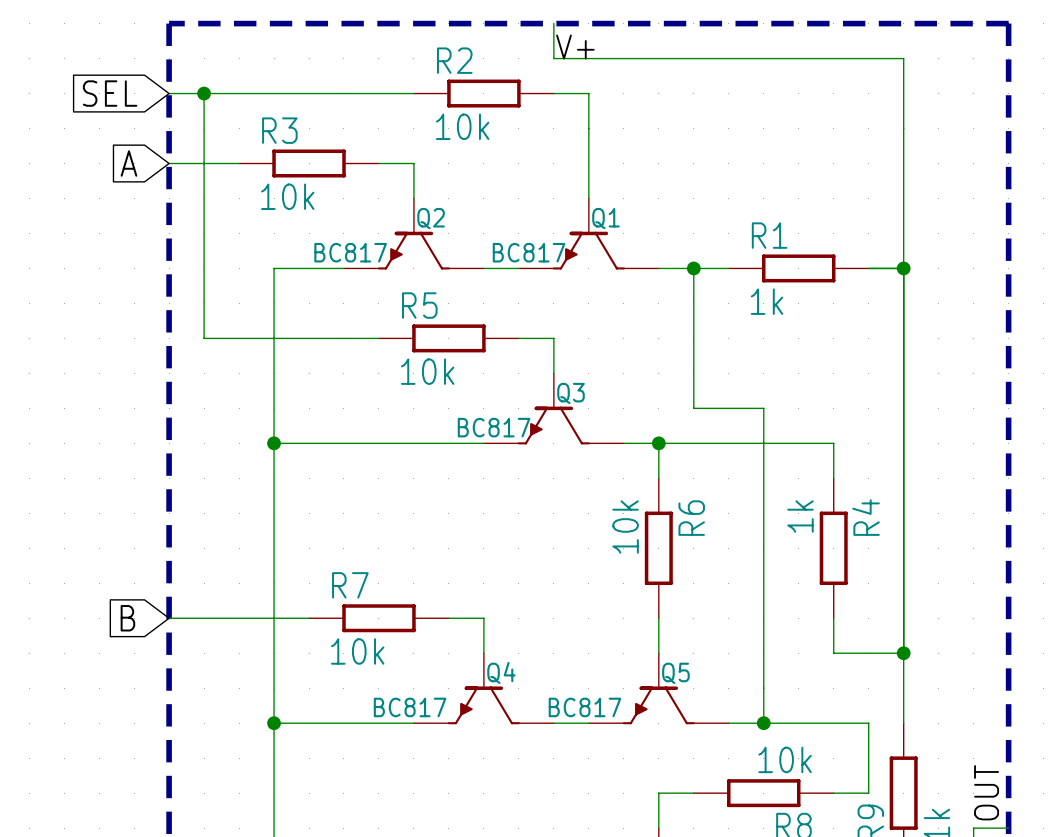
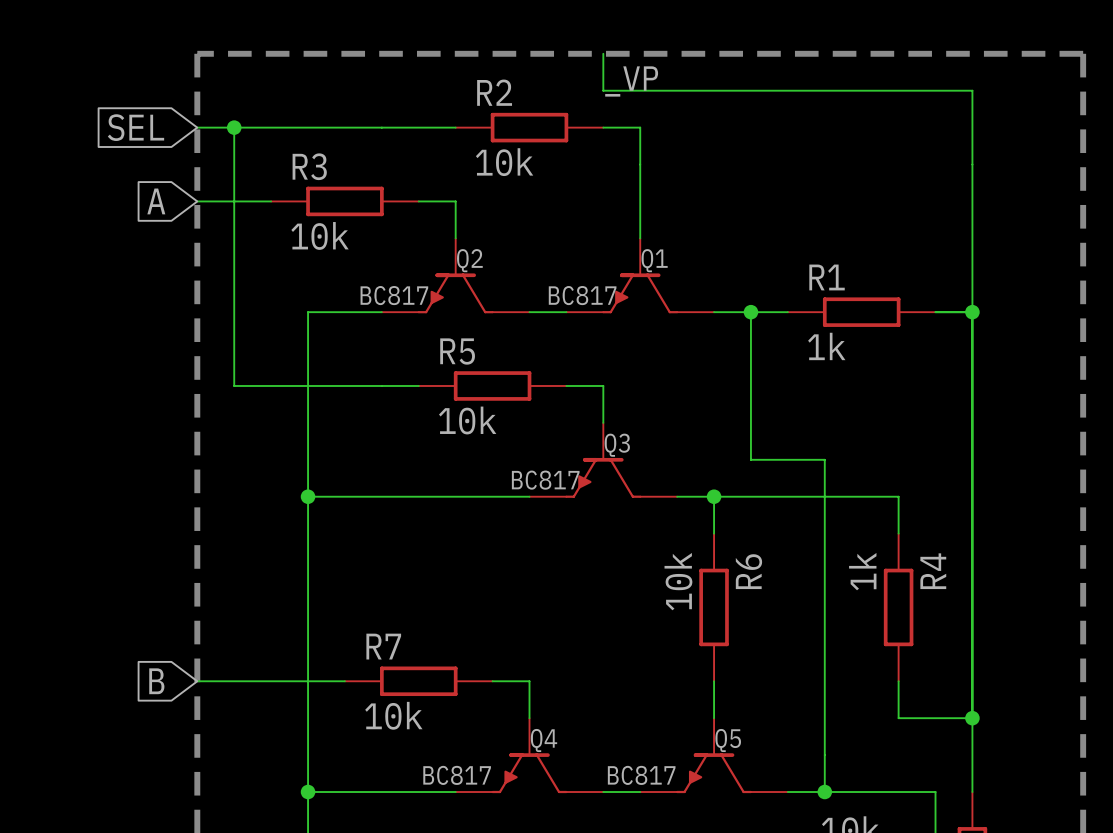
label: V+ (575, 47) -> _VP (631, 81)

